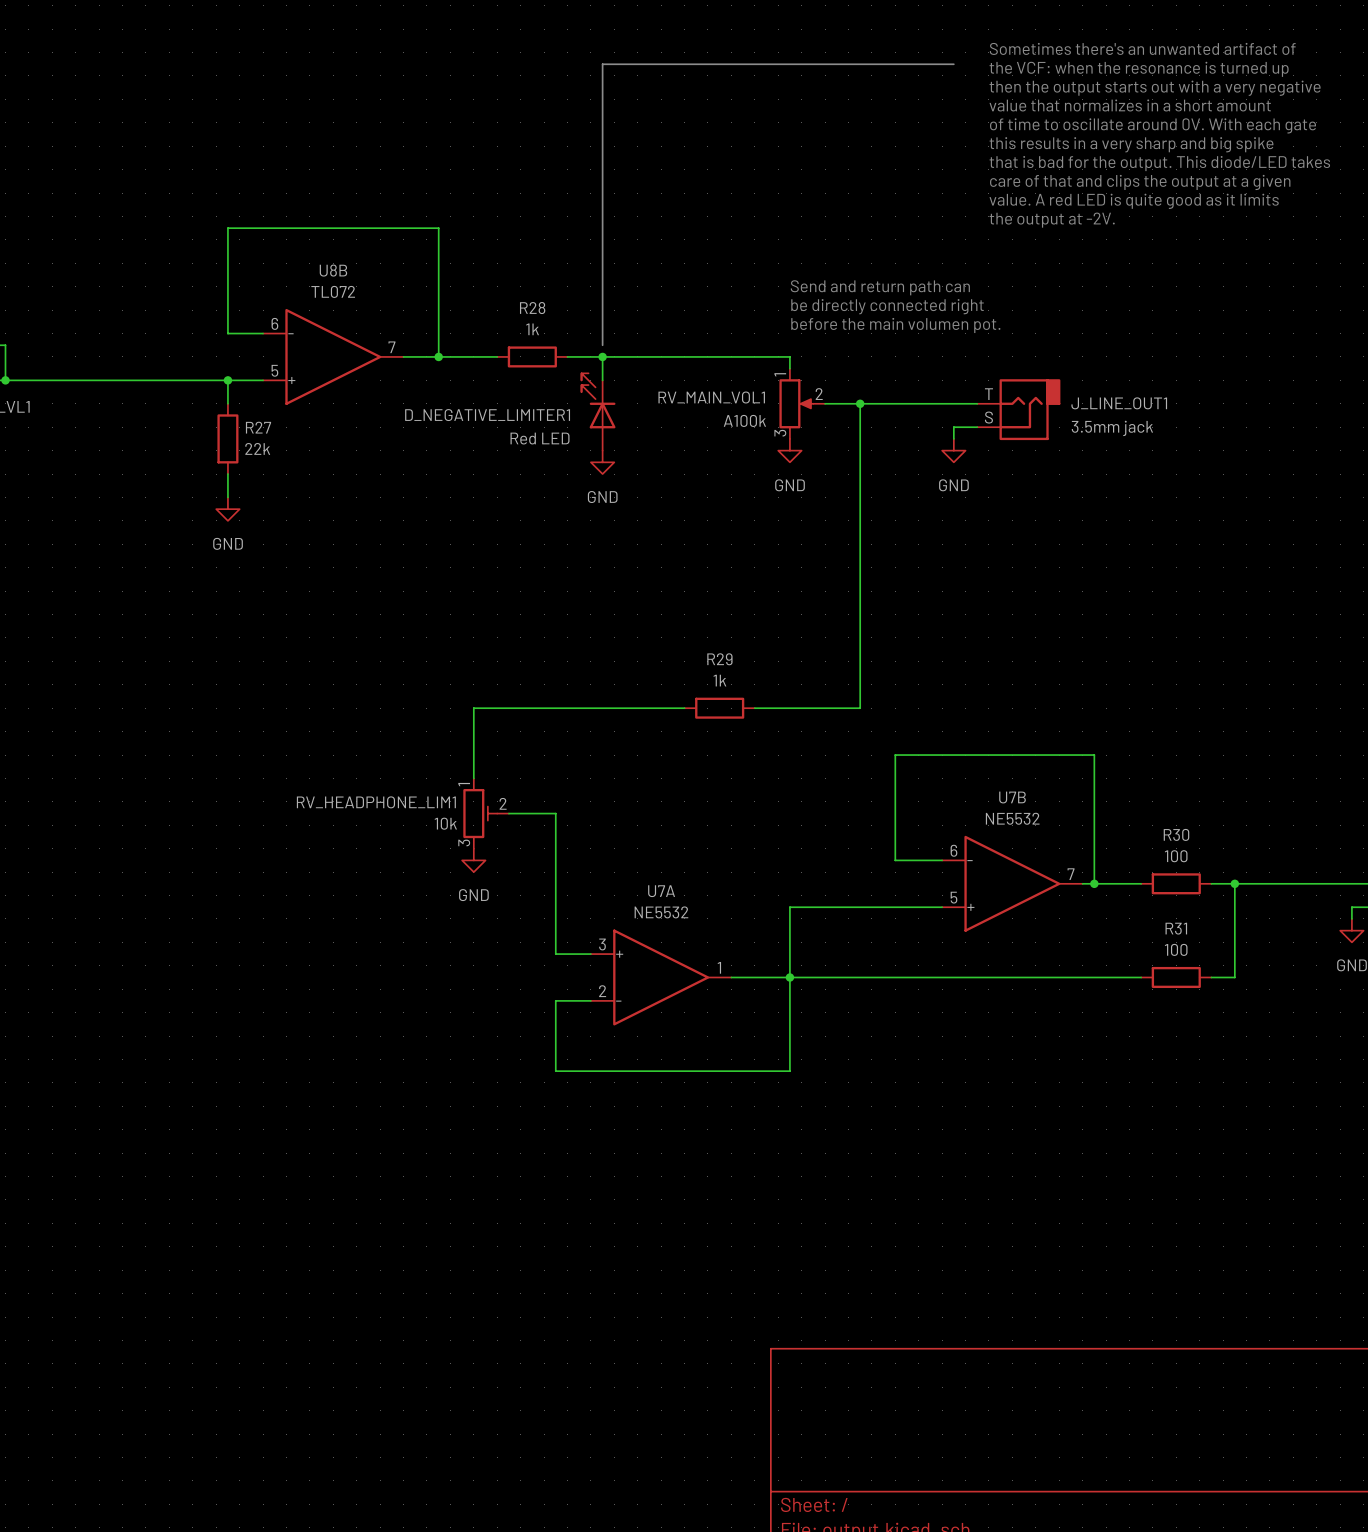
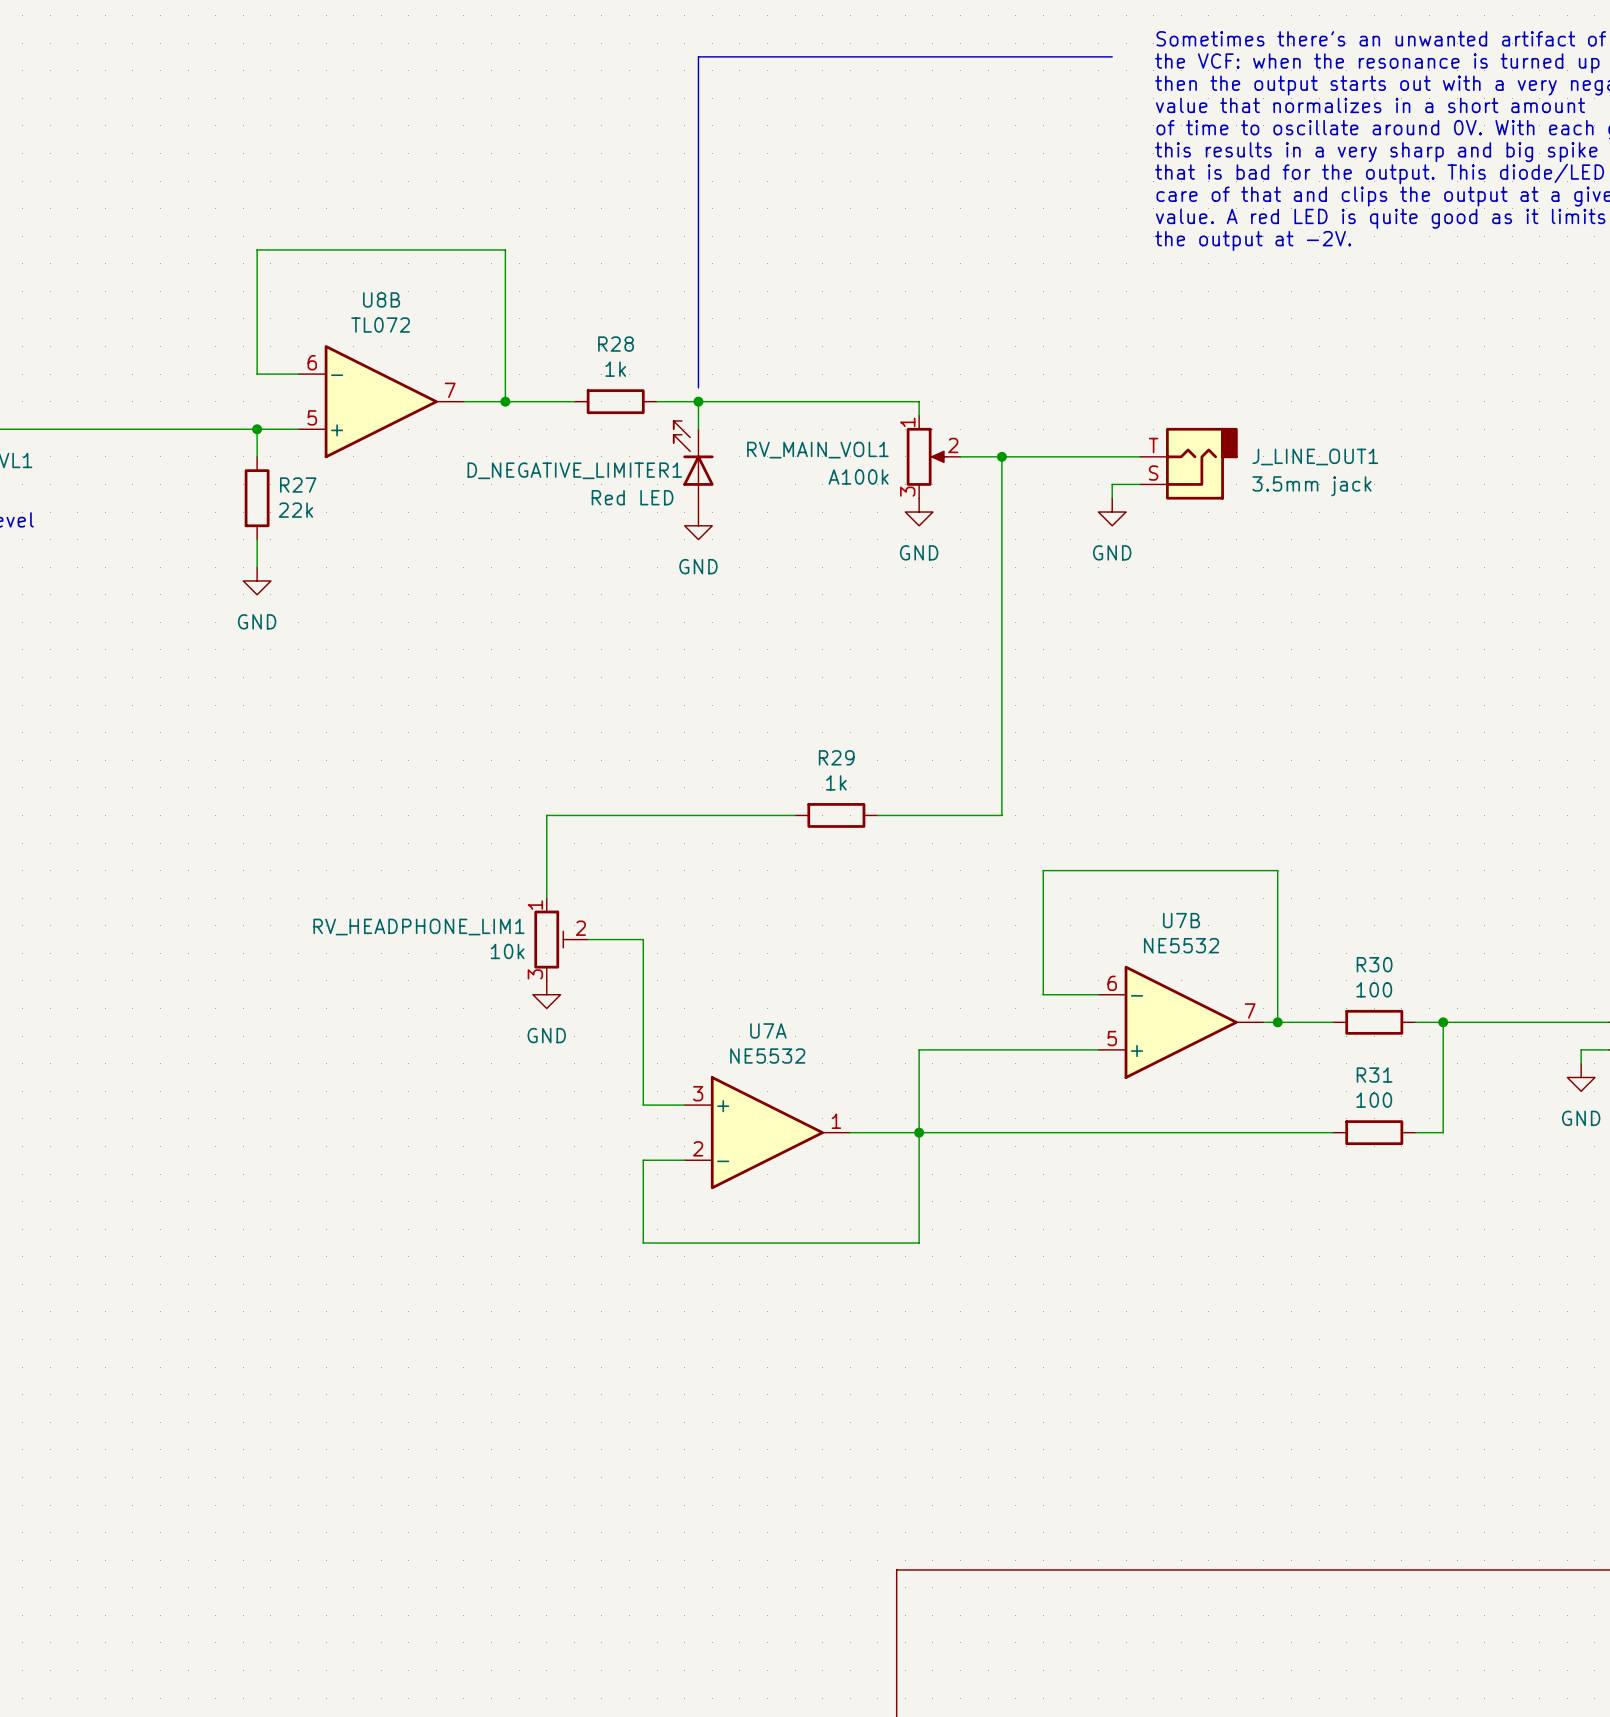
text: Send and return path can (880, 287) -> none
text: be directly connected right (887, 306) -> none
text: before the main volumen pot. (895, 325) -> none

